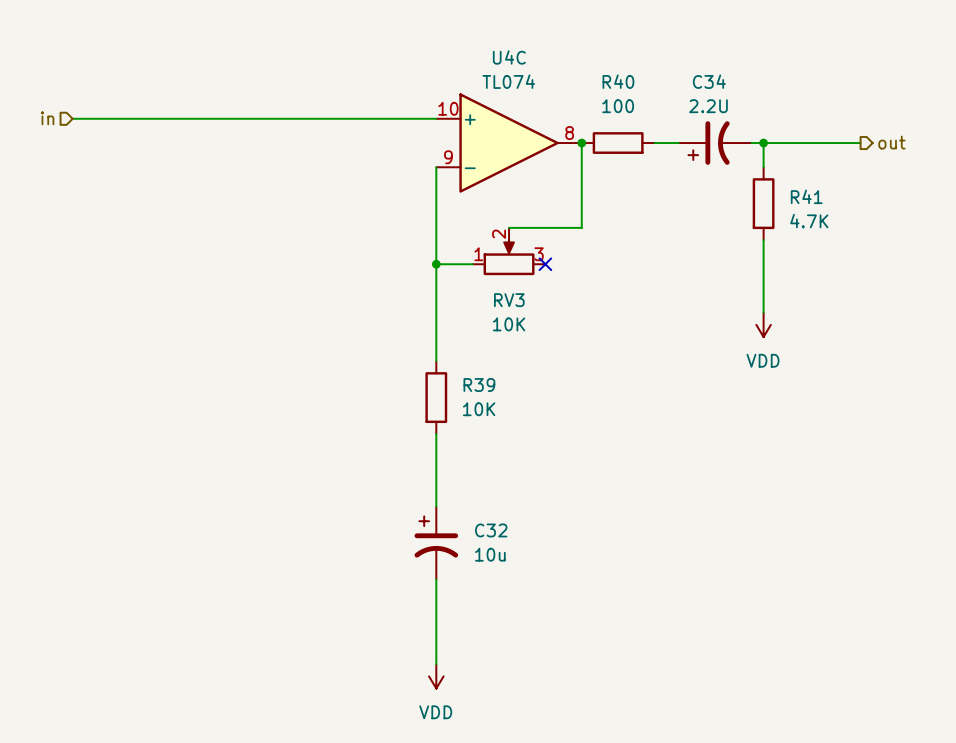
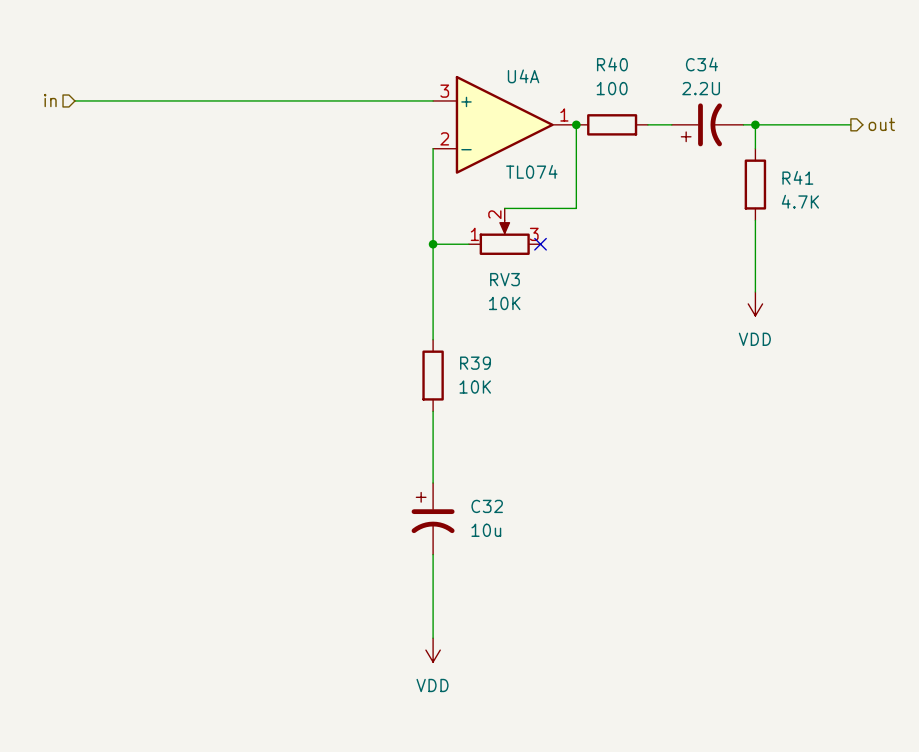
U4C name: U4C (509, 57) -> U4A (523, 76)
U4C value position: TL074 (508, 81) -> TL074 (531, 171)
U4C pin number: 10 (448, 108) -> 3 (444, 91)
U4C pin number: 8 (569, 133) -> 1 (564, 115)
U4C pin number: 9 (448, 157) -> 2 (444, 138)

